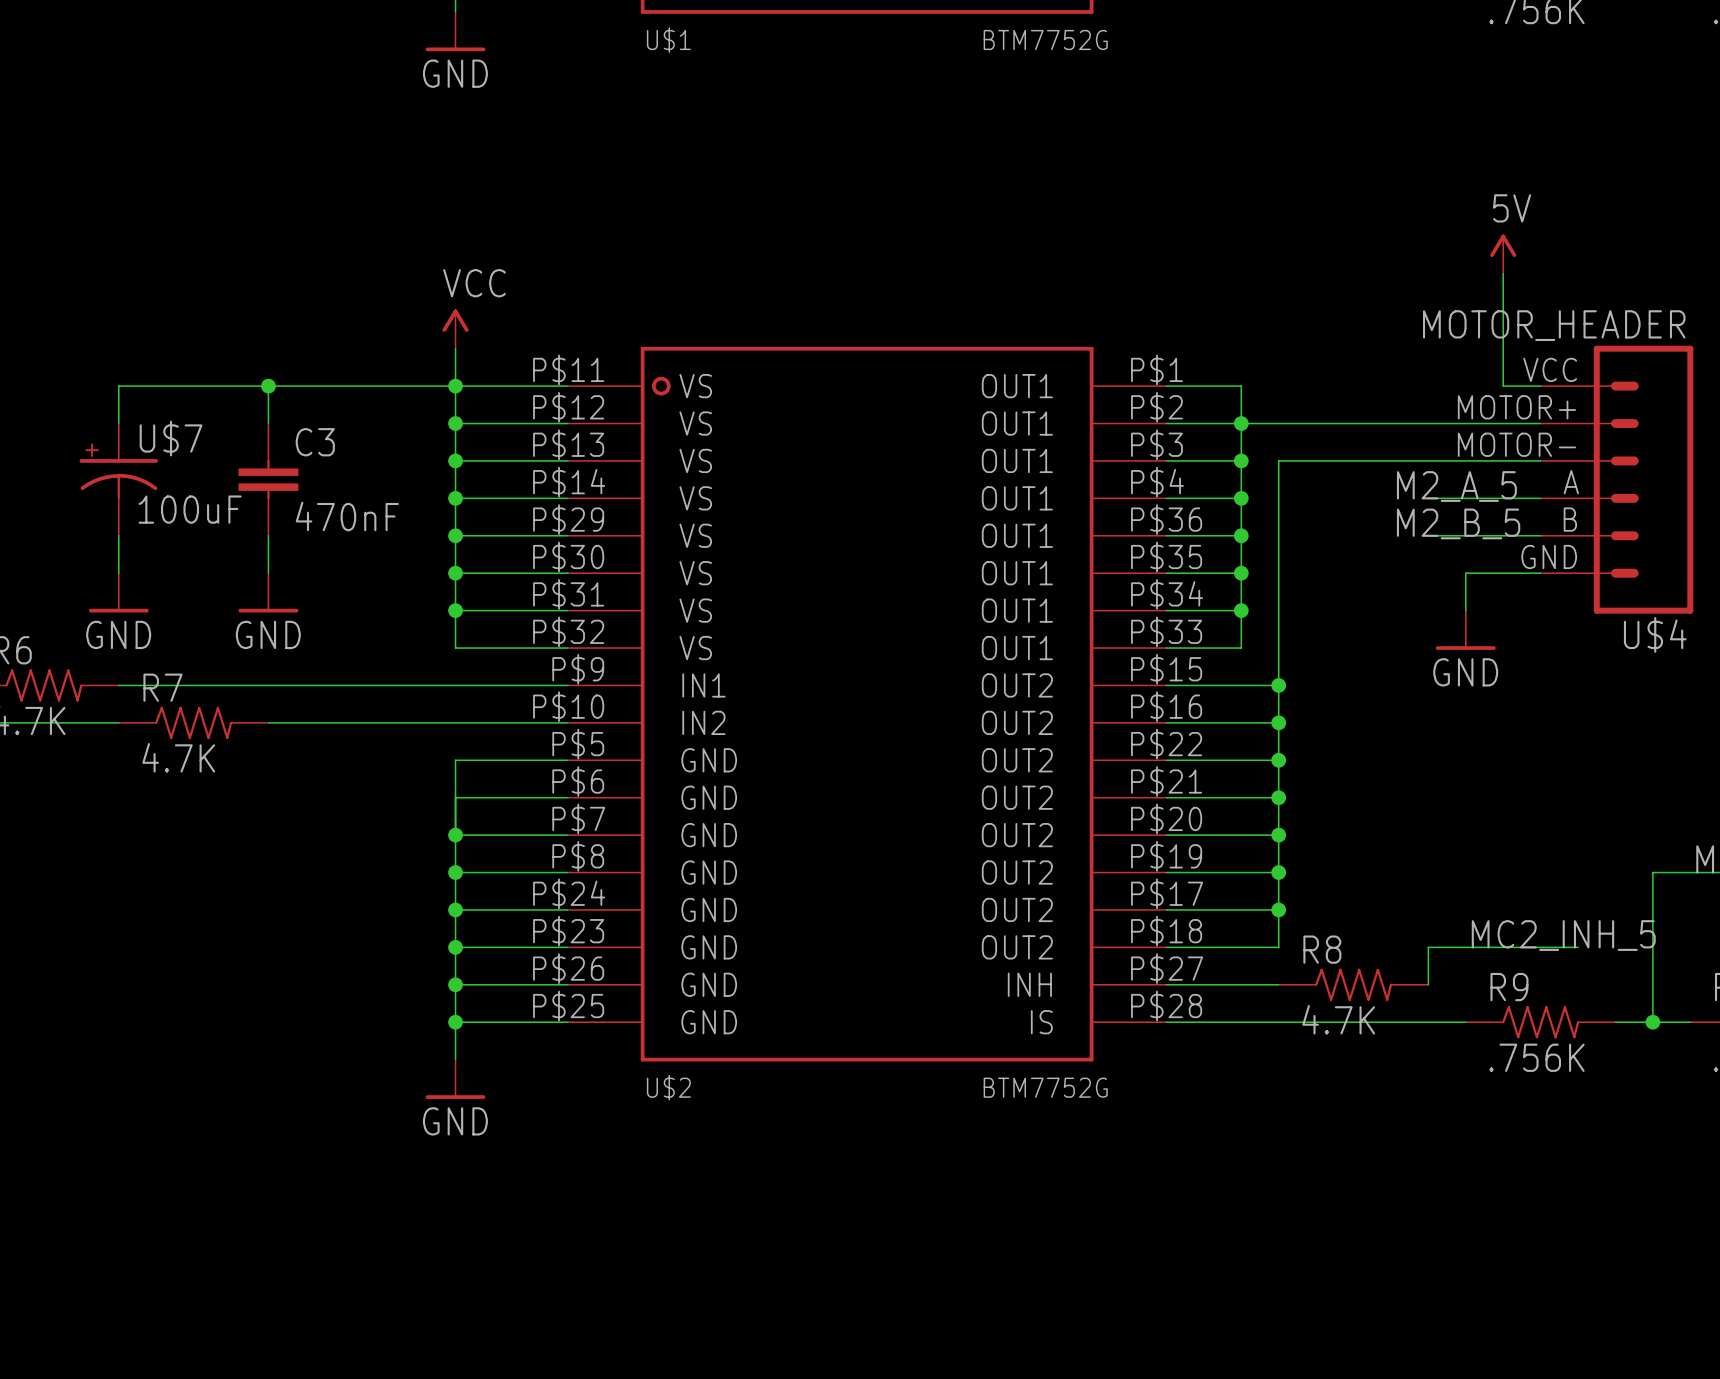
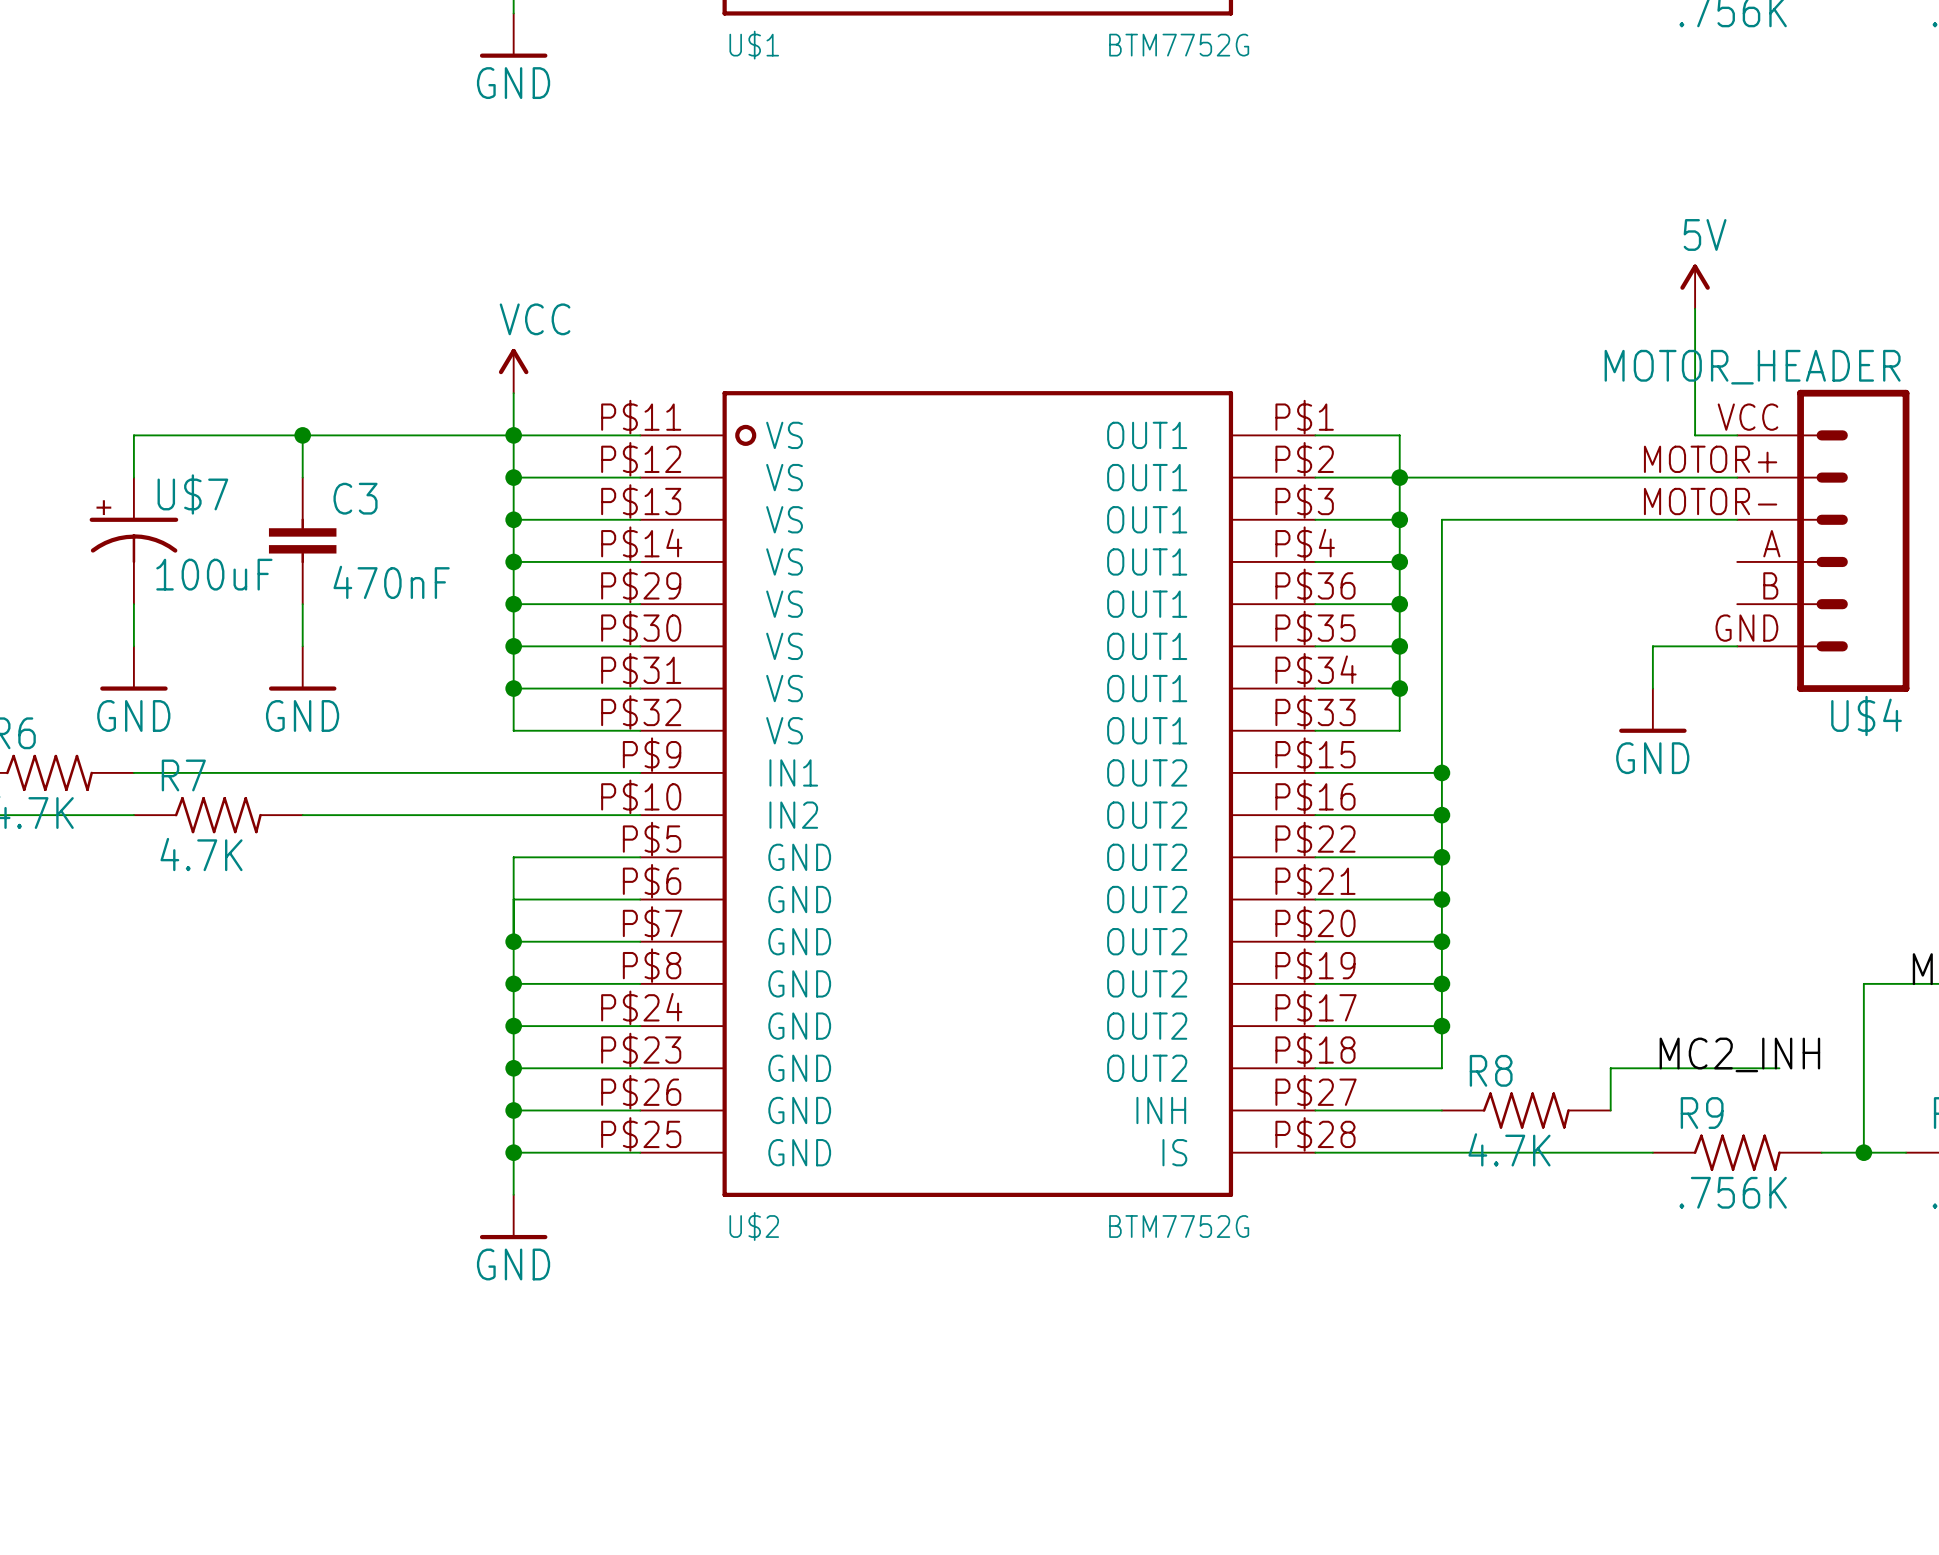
label: M2_A_5 (1456, 486) -> none
wire: (1428, 498) (1540, 498) -> none
label: M2_B_5 (1458, 523) -> none
wire: (1428, 535) (1540, 535) -> none
label: MC2_INH_5 (1563, 935) -> MC2_INH (1739, 1054)

